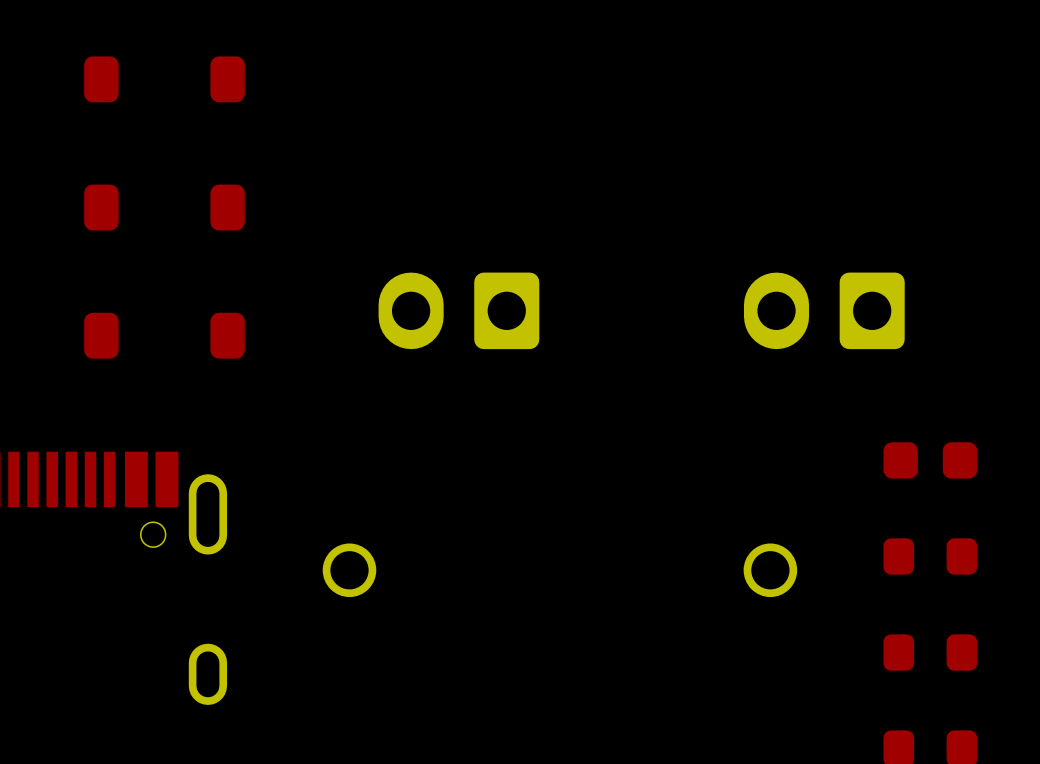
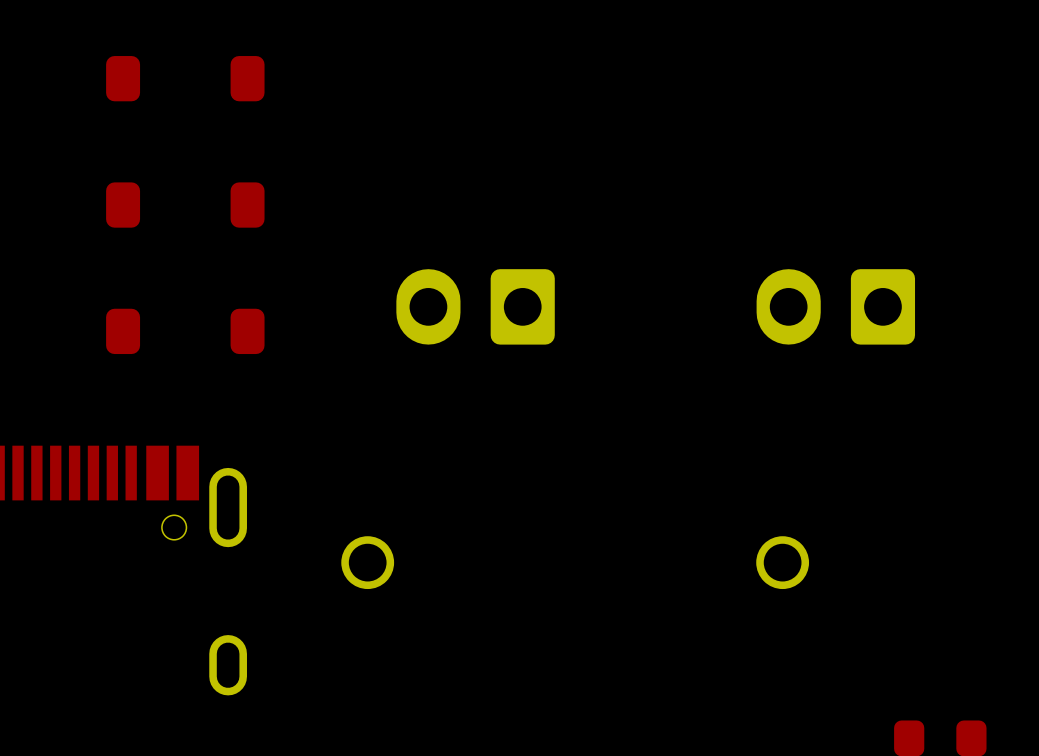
part: (930, 460) -> none
part: (930, 556) -> none
part: (930, 652) -> none

